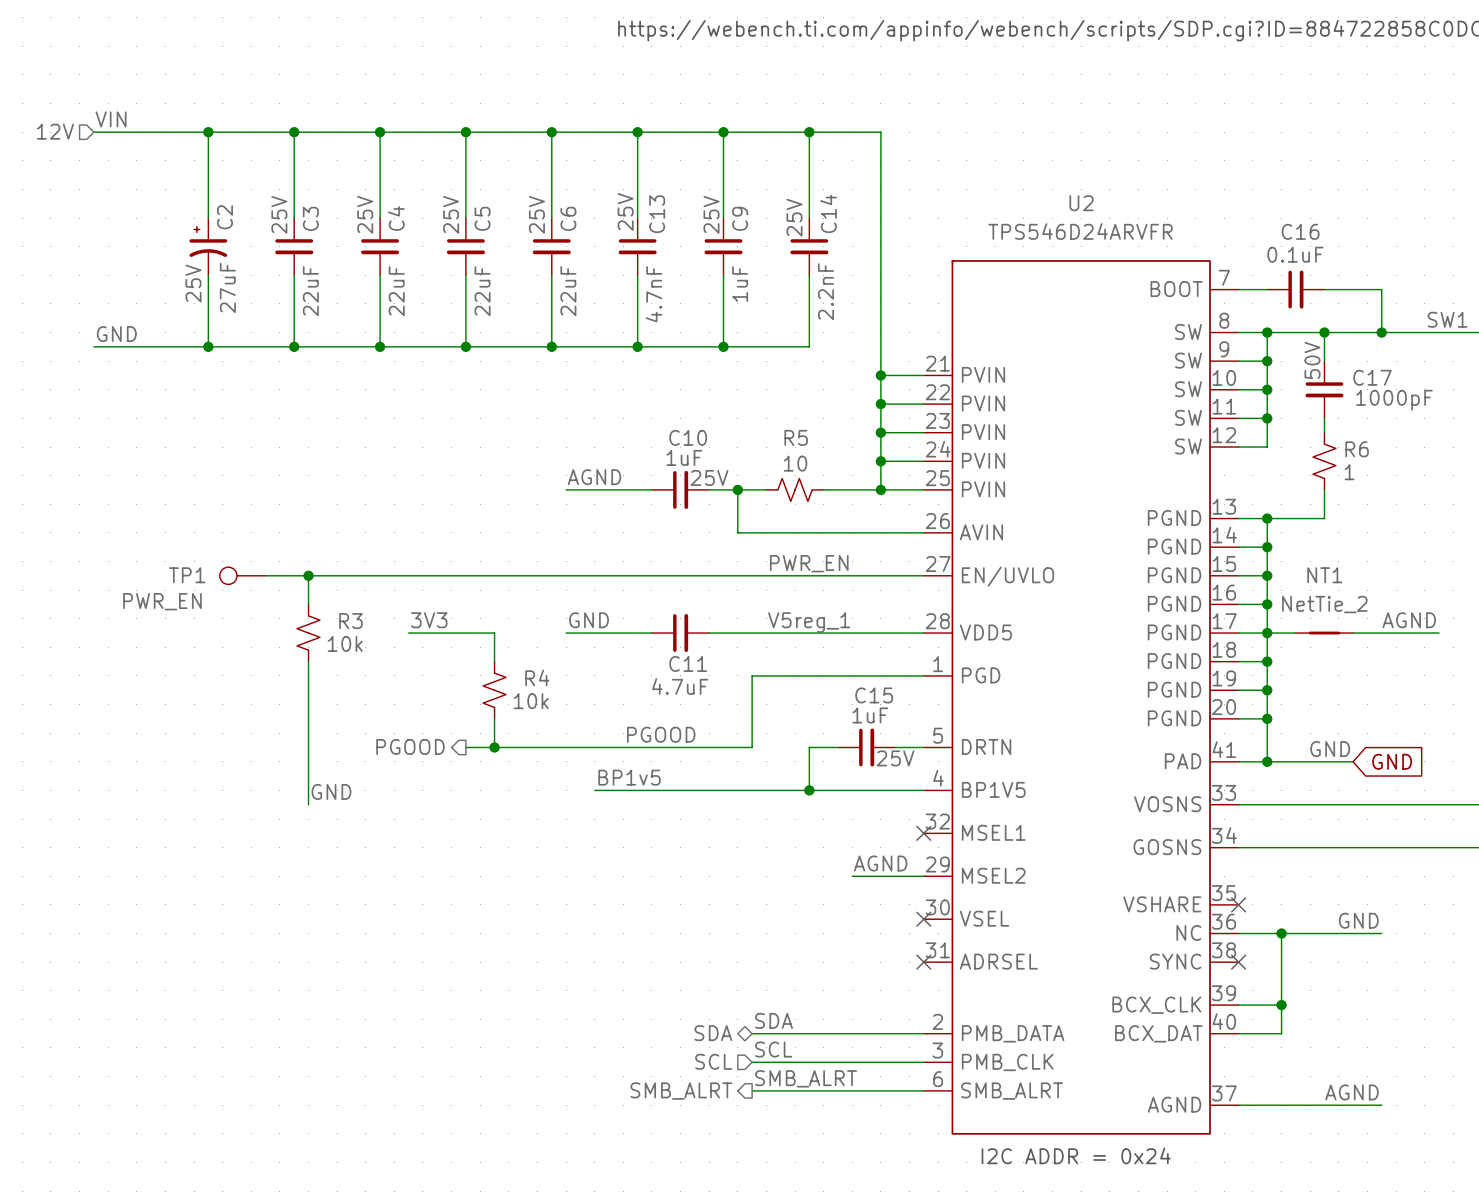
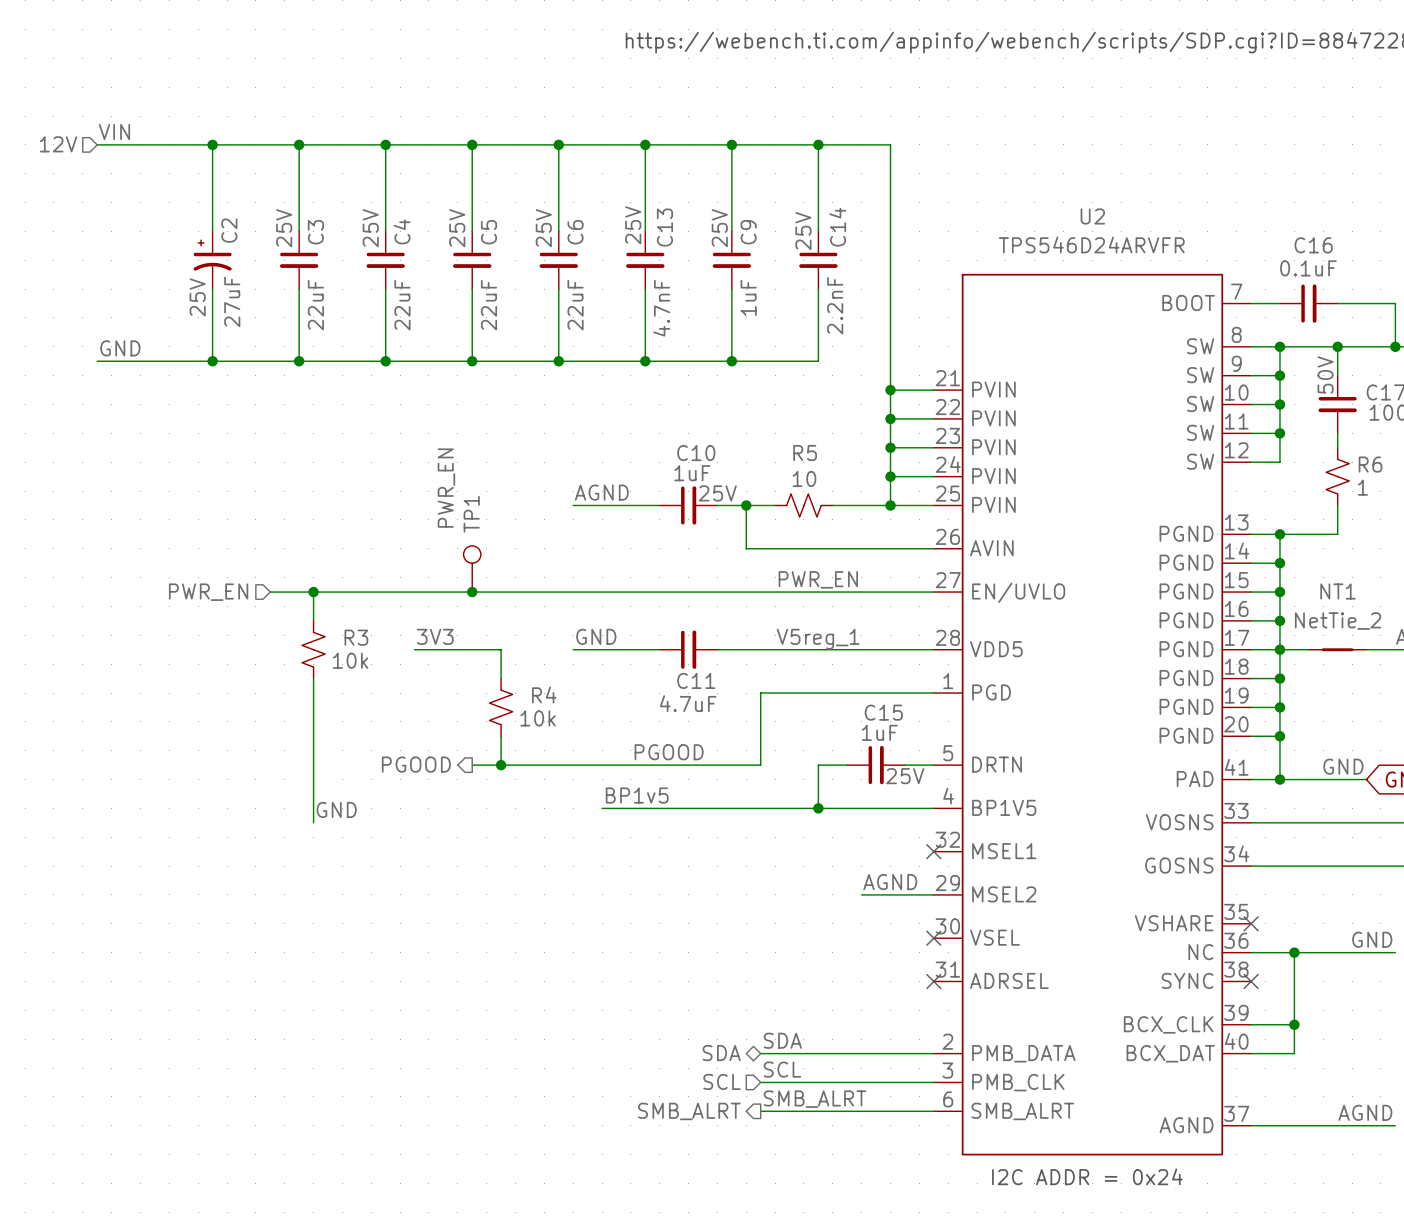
hierarchical label: none -> PWR_EN (208, 592)
TP1 rotation: 0° (228, 575) -> 90° clockwise (472, 554)
TP1 position: (242, 575) -> (472, 568)
junction: none -> (472, 592)

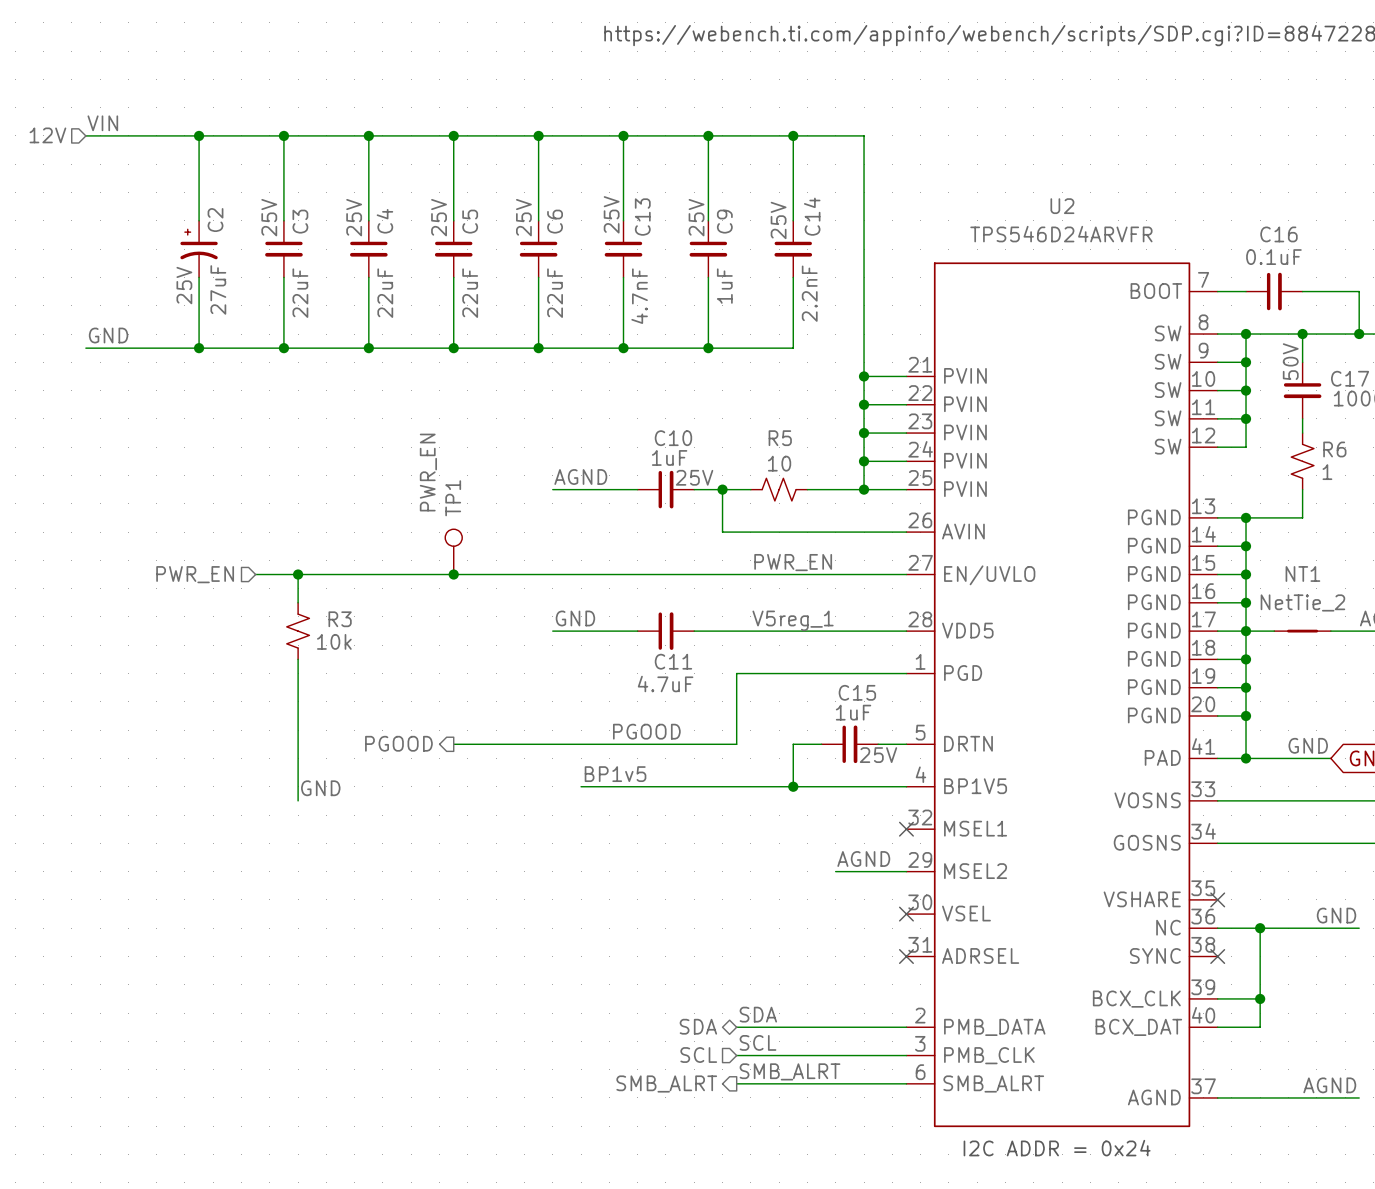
label: 3V3 (435, 636) -> none
wire: (414, 649) (501, 649) (501, 678) -> none
R4: 10k (501, 707) -> none
wire: (501, 736) (501, 765) -> none
junction: (501, 765) -> none

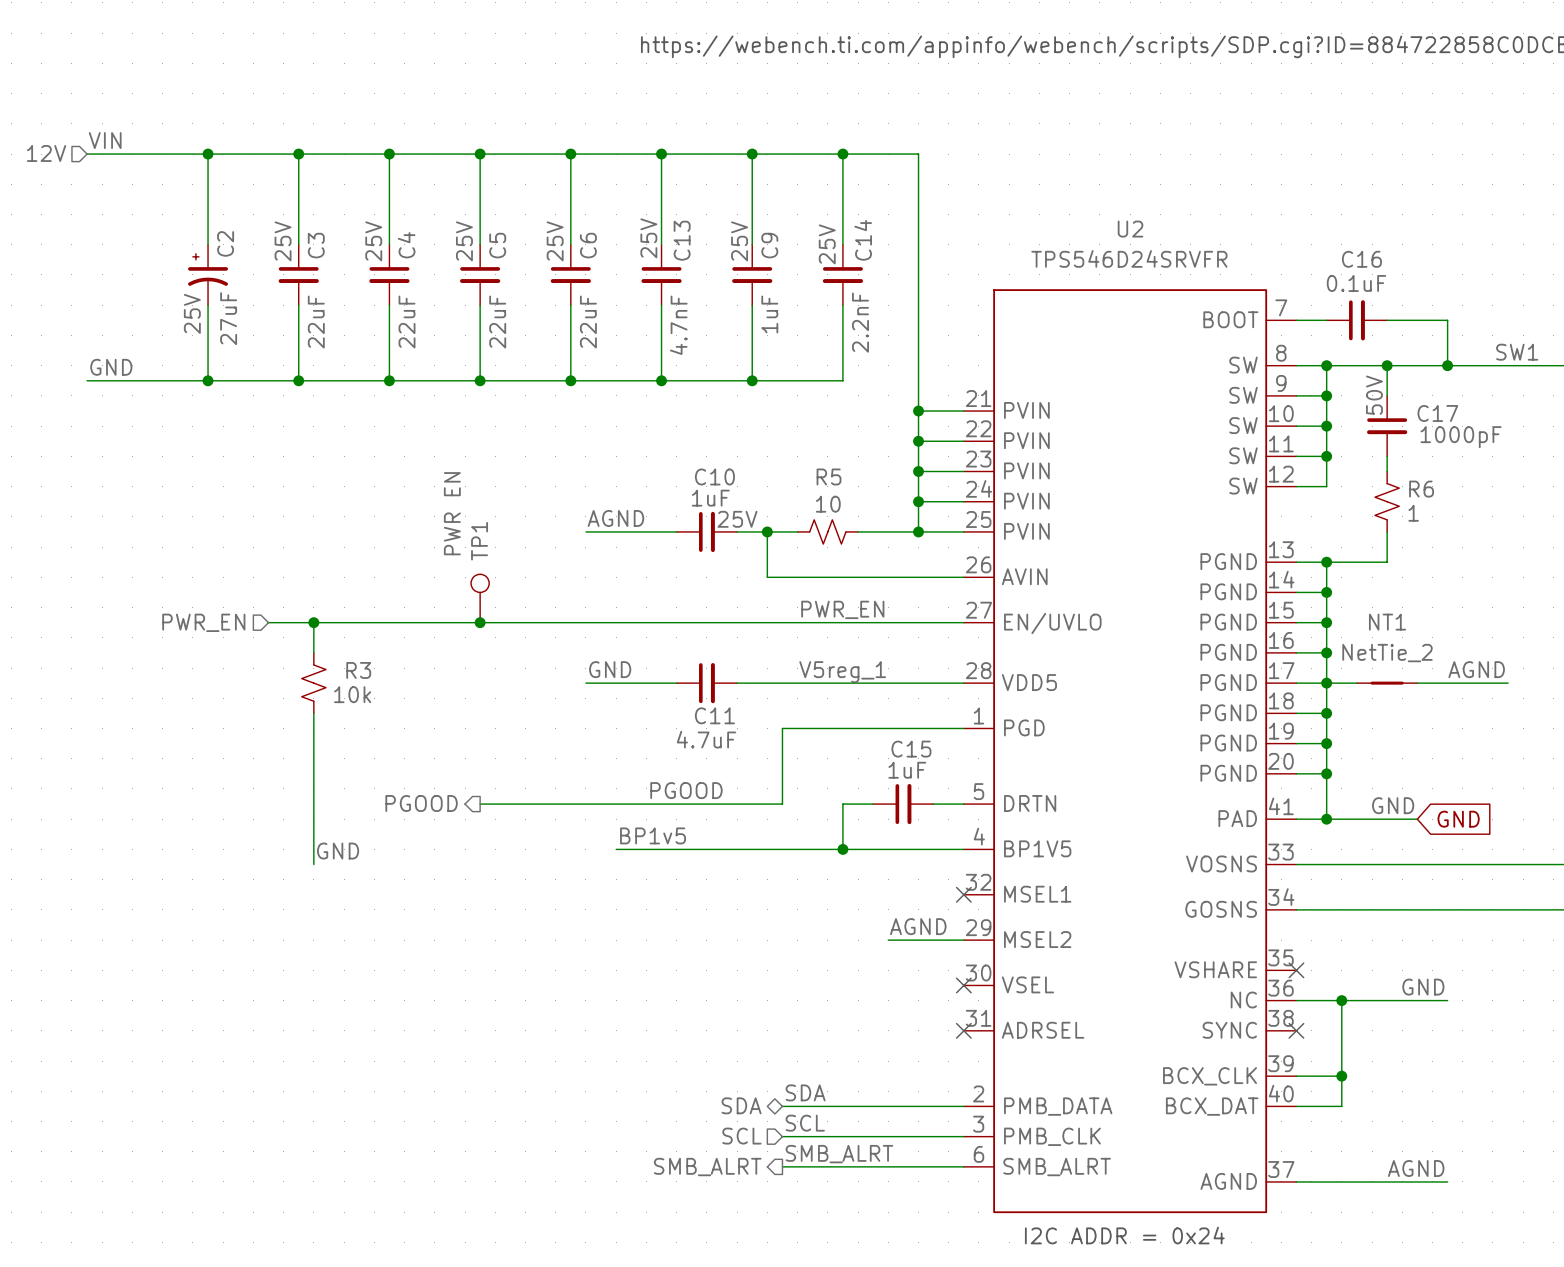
U2 value: TPS546D24ARVFR (1061, 234) -> TPS546D24SRVFR (1129, 258)
TP1 value: PWR_EN (428, 472) -> PWR EN (452, 513)
C15 text: 25V (878, 755) -> none

